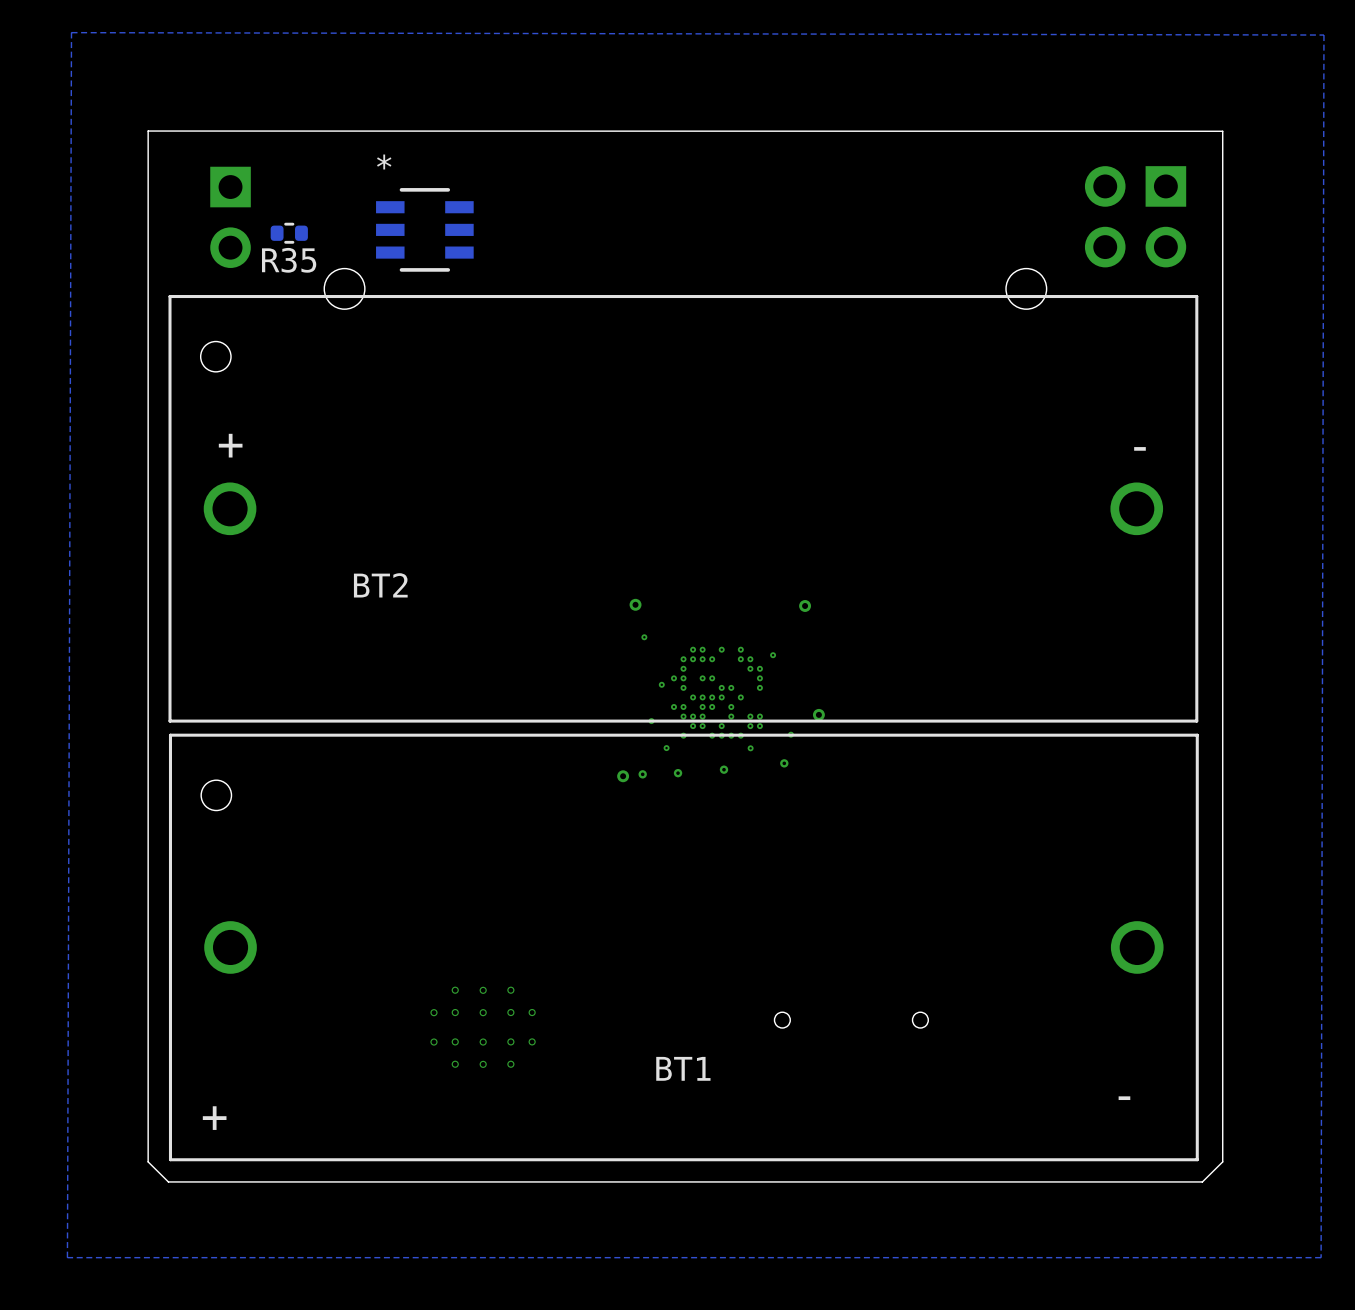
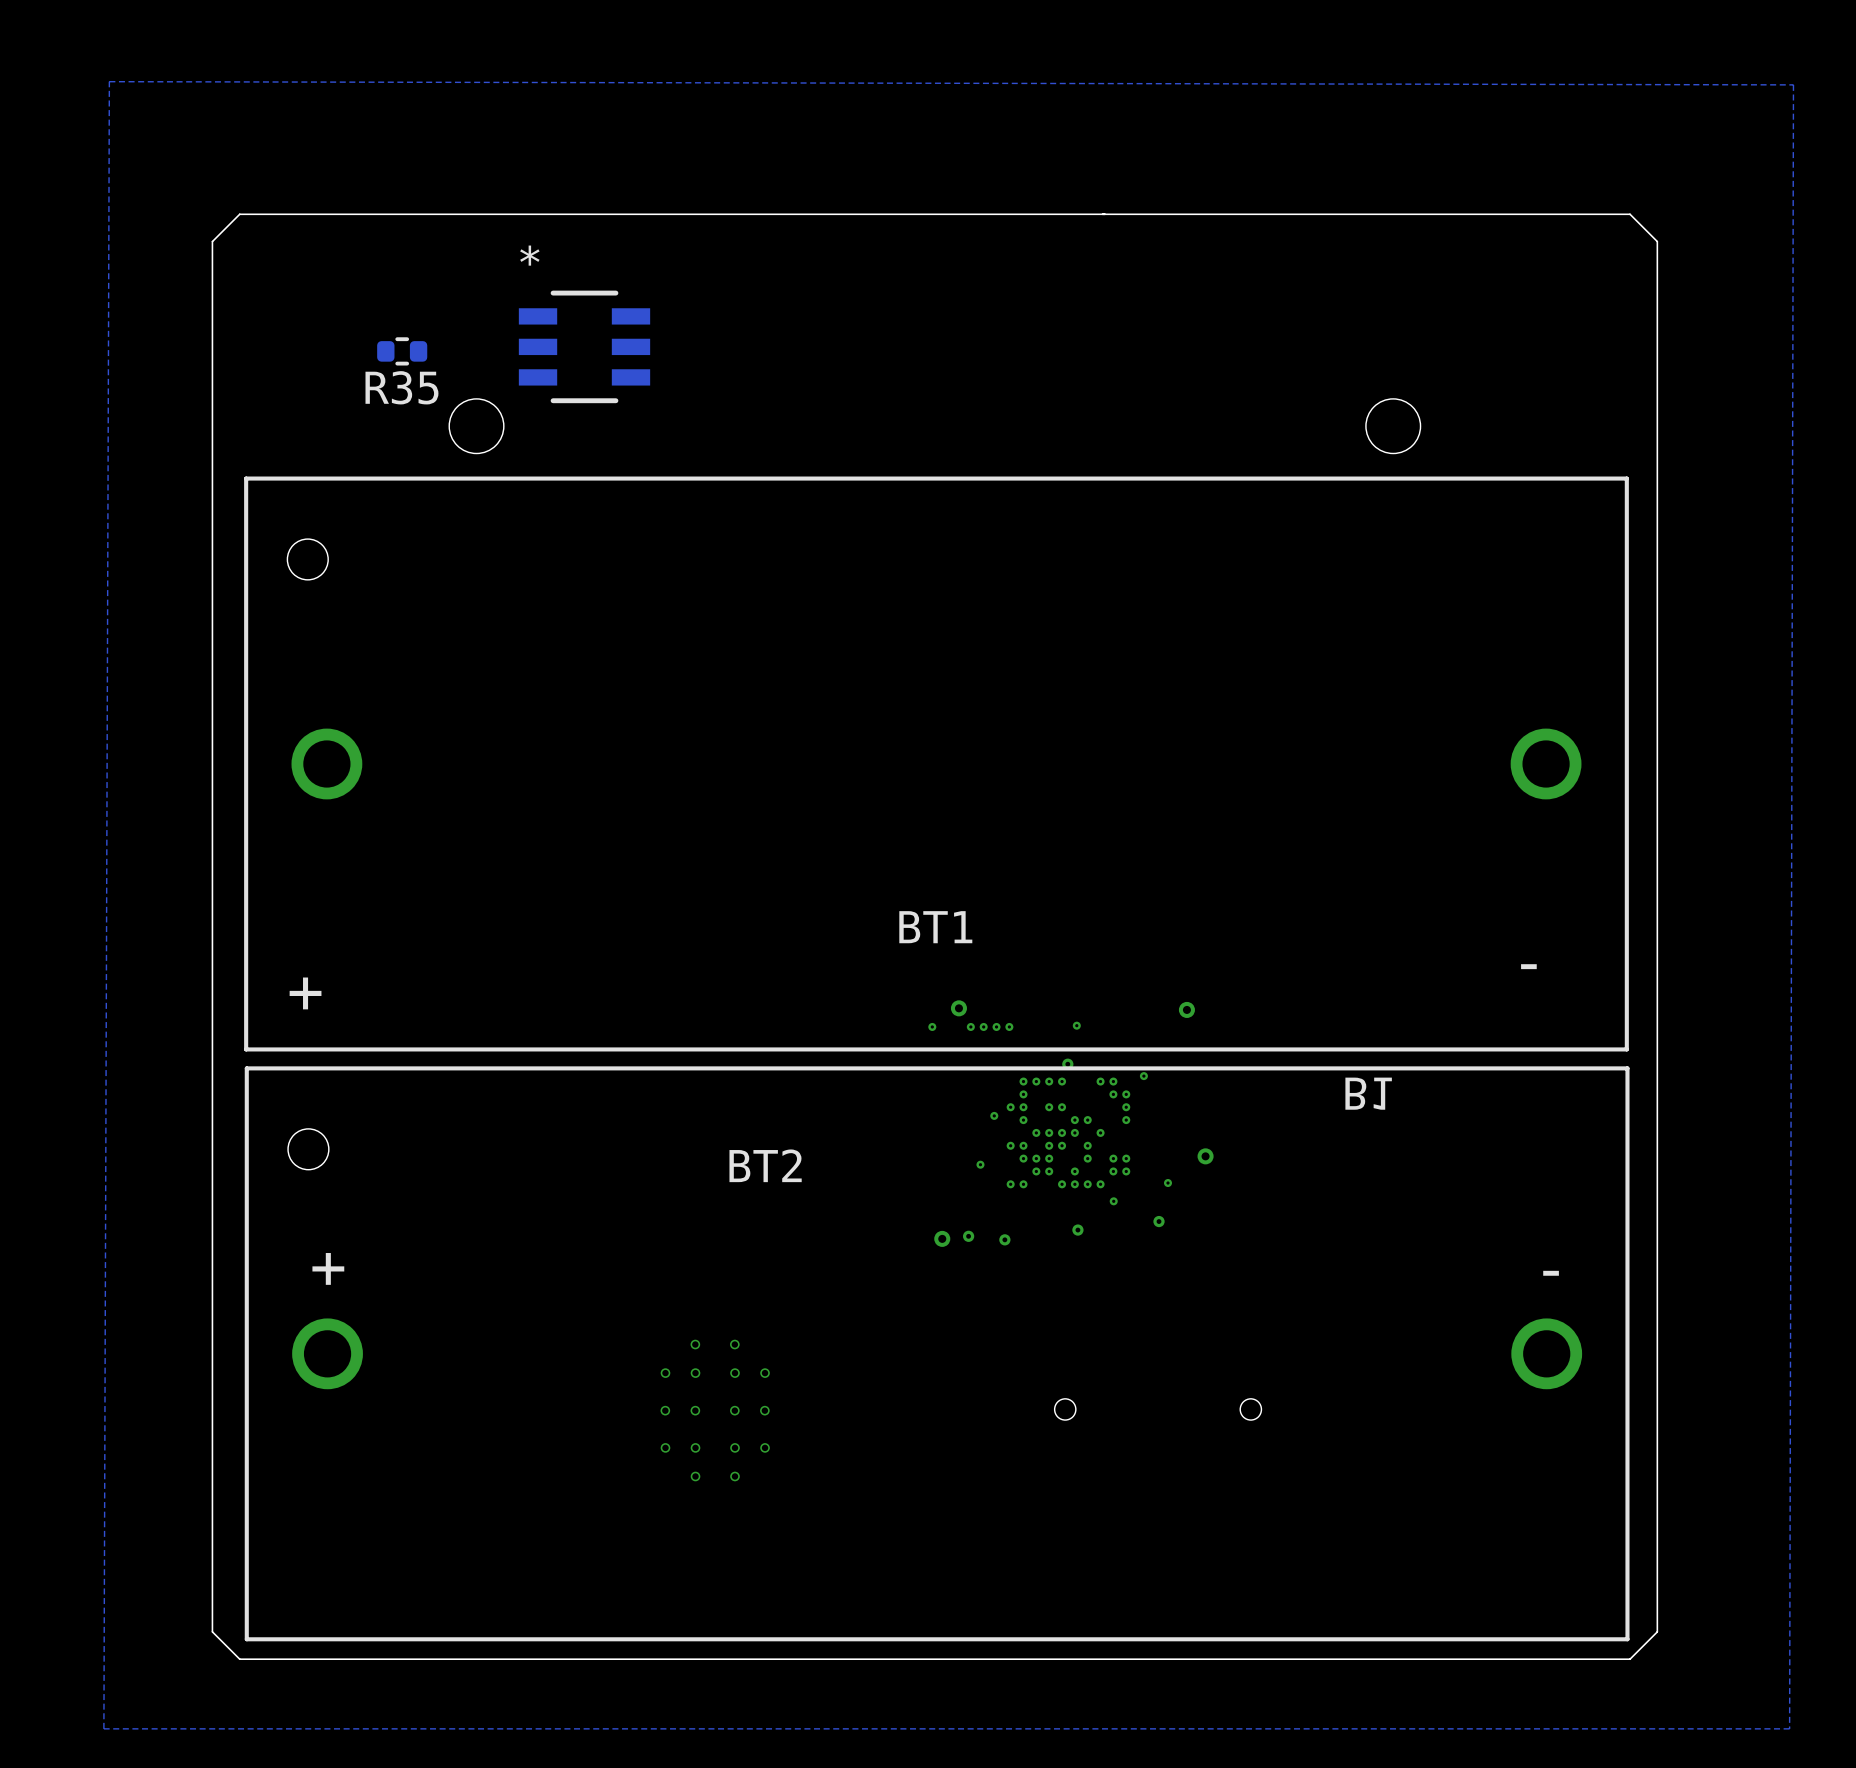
board edge: (1222, 151) (1222, 131) (148, 131) (148, 151) -> (1657, 241) (1630, 214) (239, 214) (212, 241)
part: (1135, 216) -> none
part: (230, 217) -> none
BT2 position: (683, 508) -> (937, 1353)
BT2 name position: BT2 (380, 585) -> BT2 (765, 1165)
via: (635, 604) -> none
via: (805, 605) -> none
via: (644, 637) -> none
via: (693, 649) -> none
via: (702, 649) -> none
via: (721, 649) -> none
via: (740, 649) -> none
via: (773, 655) -> none
via: (683, 659) -> none
via: (693, 659) -> none
via: (702, 659) -> none
via: (712, 659) -> none
via: (740, 659) -> none
via: (750, 659) -> none
via: (683, 668) -> none
via: (750, 668) -> none
via: (759, 668) -> none
via: (673, 678) -> none
via: (683, 678) -> none
via: (702, 678) -> none
via: (712, 678) -> none
via: (759, 678) -> none
via: (661, 684) -> none
via: (683, 687) -> none
via: (721, 687) -> none
via: (731, 687) -> none
via: (759, 687) -> none
via: (693, 697) -> none
via: (702, 697) -> none
via: (712, 697) -> none
via: (721, 697) -> none
via: (740, 697) -> none
via: (673, 707) -> none
via: (683, 707) -> none
via: (702, 707) -> none
via: (712, 707) -> none
via: (731, 707) -> none
via position: (818, 714) -> (1186, 1009)
via: (683, 716) -> none
via: (693, 716) -> none
via: (702, 716) -> none
via: (731, 716) -> none
via: (750, 716) -> none
via: (759, 716) -> none
via: (651, 721) -> none
via: none -> (958, 1008)
via: (693, 726) -> none
via: (702, 726) -> none
via: (721, 726) -> none
via: (750, 726) -> none
via: (759, 726) -> none
via: (666, 748) -> none
via: (750, 748) -> none
via: (724, 769) -> none
via: none -> (1143, 1076)
via: (678, 773) -> none
via: (642, 774) -> none
via: (623, 776) -> none
via: none -> (1023, 1081)
via: none -> (1036, 1081)
via: none -> (1049, 1081)
via: none -> (1062, 1081)
via: none -> (1100, 1081)
via: none -> (1113, 1081)
via: none -> (1023, 1094)
via: none -> (1113, 1094)
via: none -> (1126, 1094)
part: none -> (1368, 1093)
via: none -> (1010, 1107)
via: none -> (1023, 1107)
via: none -> (1049, 1107)
via: none -> (1062, 1107)
via: none -> (1126, 1107)
via: none -> (994, 1115)
via: none -> (1023, 1120)
via: none -> (1074, 1120)
via: none -> (1087, 1120)
via: none -> (1126, 1120)
via: none -> (1036, 1132)
via: none -> (1049, 1132)
via: none -> (1062, 1132)
via: none -> (1074, 1132)
via: none -> (1100, 1132)
via: none -> (1010, 1145)
via: none -> (1023, 1145)
via: none -> (1049, 1145)
via: none -> (1062, 1145)
via: none -> (1087, 1145)
via: none -> (1205, 1156)
via: none -> (1023, 1158)
via: none -> (1036, 1158)
via: none -> (1049, 1158)
via: none -> (1087, 1158)
via: none -> (1113, 1158)
via: none -> (1126, 1158)
via: none -> (980, 1164)
via: none -> (1036, 1171)
via: none -> (1049, 1171)
via: none -> (1074, 1171)
via: none -> (1113, 1171)
via: none -> (1126, 1171)
via: none -> (1167, 1183)
via: none -> (1010, 1184)
via: none -> (1023, 1184)
via: none -> (1062, 1184)
via: none -> (1074, 1184)
via: none -> (1087, 1184)
via: none -> (1100, 1184)
via: none -> (1113, 1201)
via: none -> (1159, 1221)
via: none -> (1077, 1230)
via: none -> (968, 1236)
via: none -> (942, 1238)
via: none -> (1004, 1239)
BT1 position: (683, 947) -> (936, 763)
part rotation: 0° (483, 1027) -> 90° clockwise (715, 1410)
board edge: (1222, 1161) (1202, 1181) (168, 1181) (148, 1161) -> (1657, 1600) (1657, 1631) (1630, 1659) (239, 1659) (212, 1631) (212, 1600)

